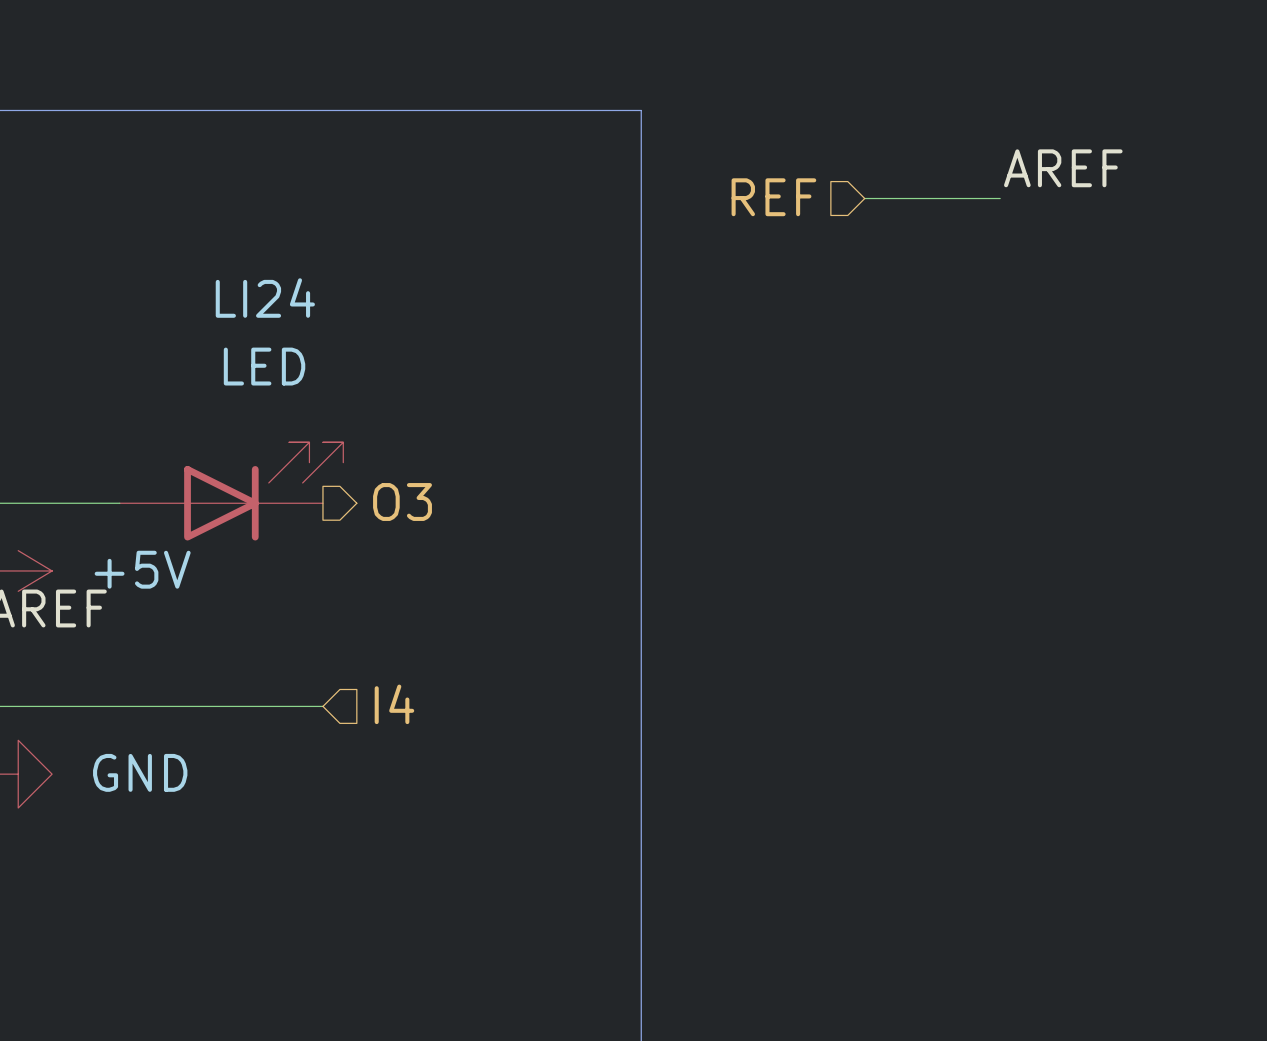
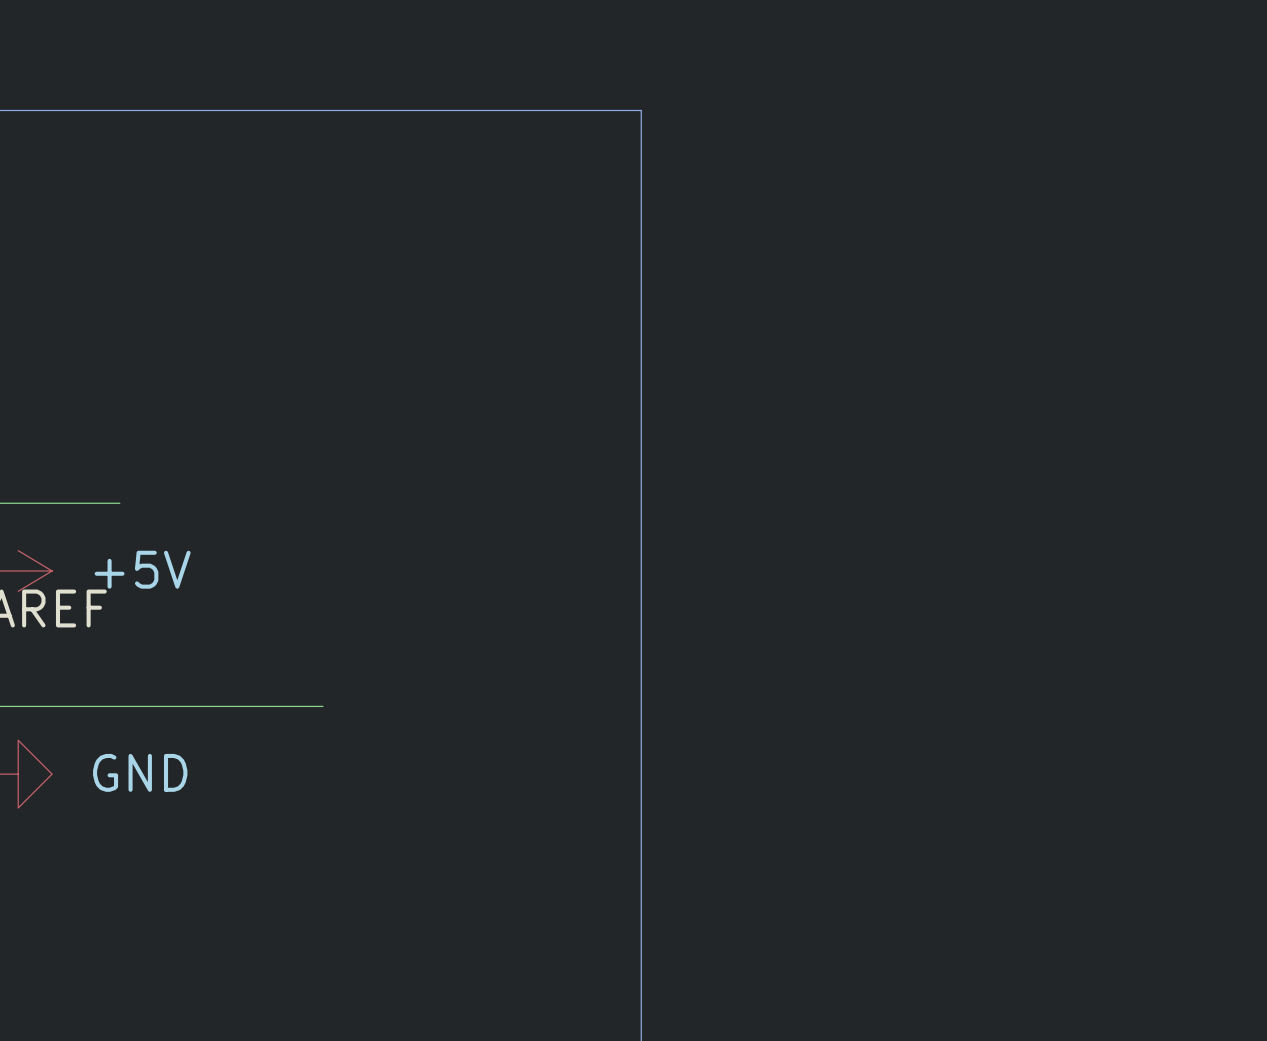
label: AREF (1063, 168) -> none
hierarchical label: REF (773, 197) -> none
wire: (864, 198) (1000, 198) -> none
LI24: LED (231, 491) -> none
hierarchical label: O3 (402, 501) -> none
hierarchical label: I4 (394, 704) -> none

